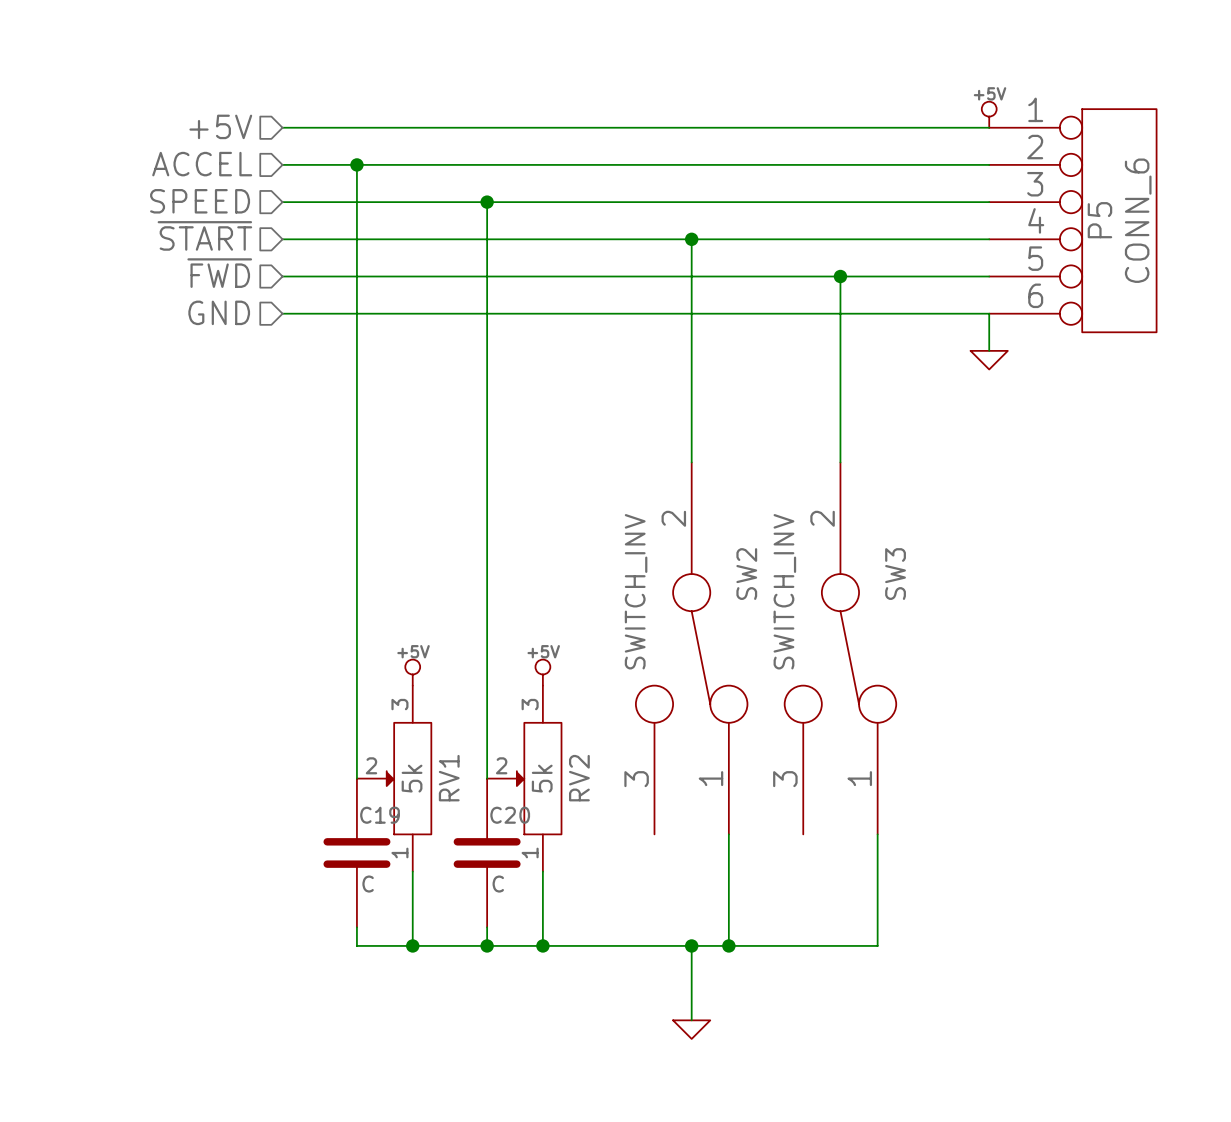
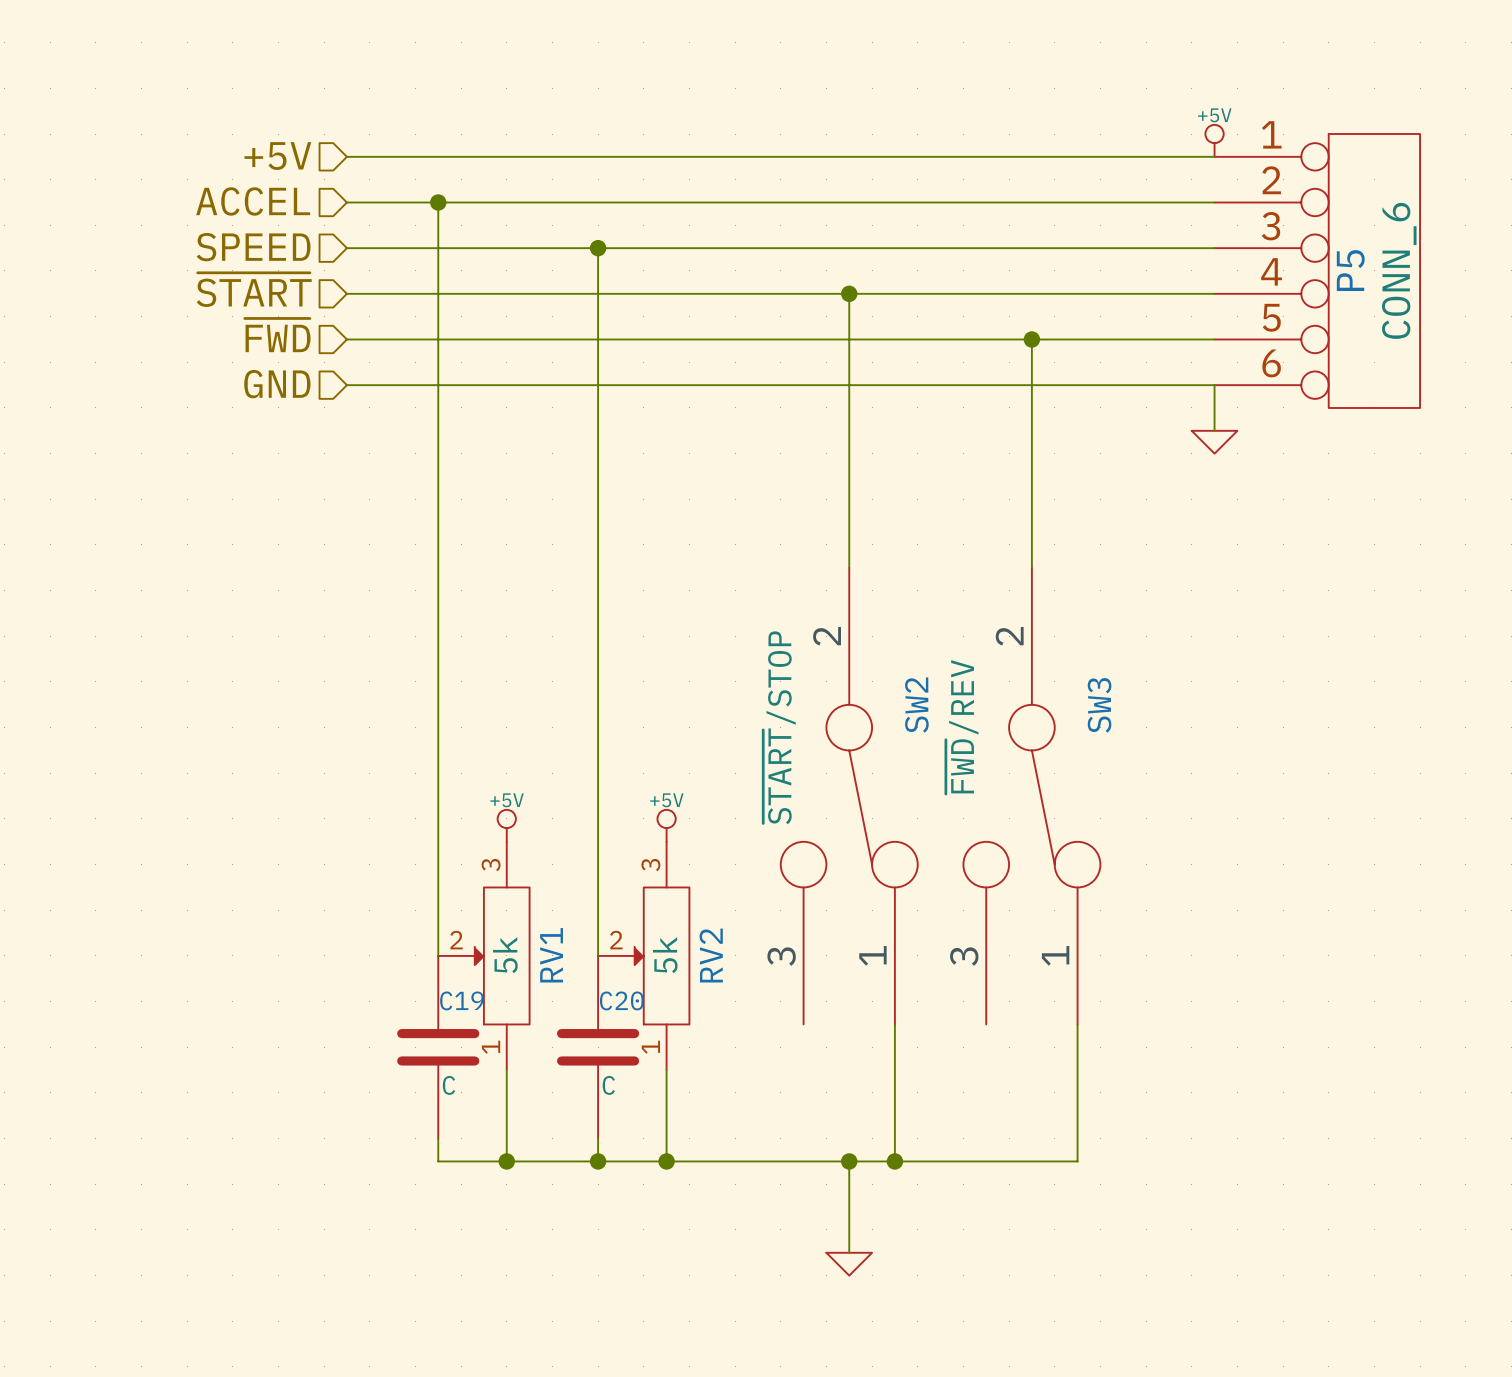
SW2 value: SWITCH_INV (636, 591) -> ~{START}/STOP (779, 727)
SW3 value: SWITCH_INV (784, 591) -> ~{FWD}/REV (962, 727)

